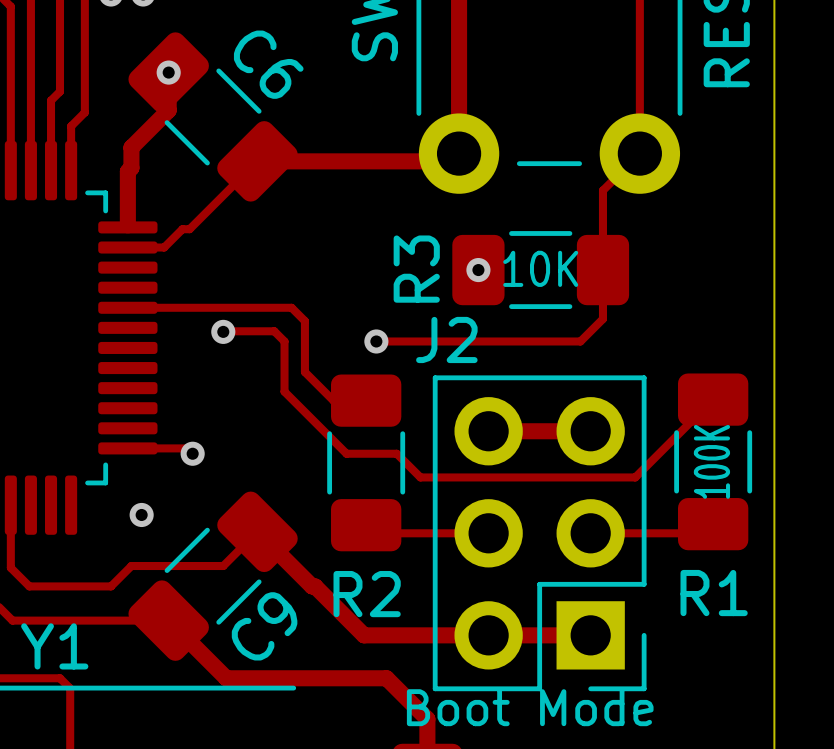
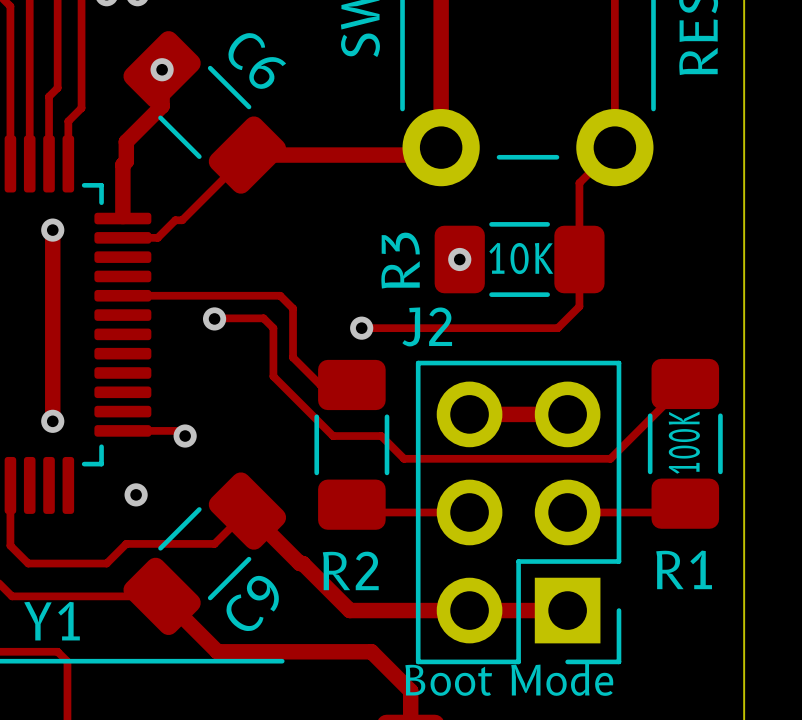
track: none -> (52, 230) (52, 421)
via: none -> (52, 230)
via: none -> (52, 421)

